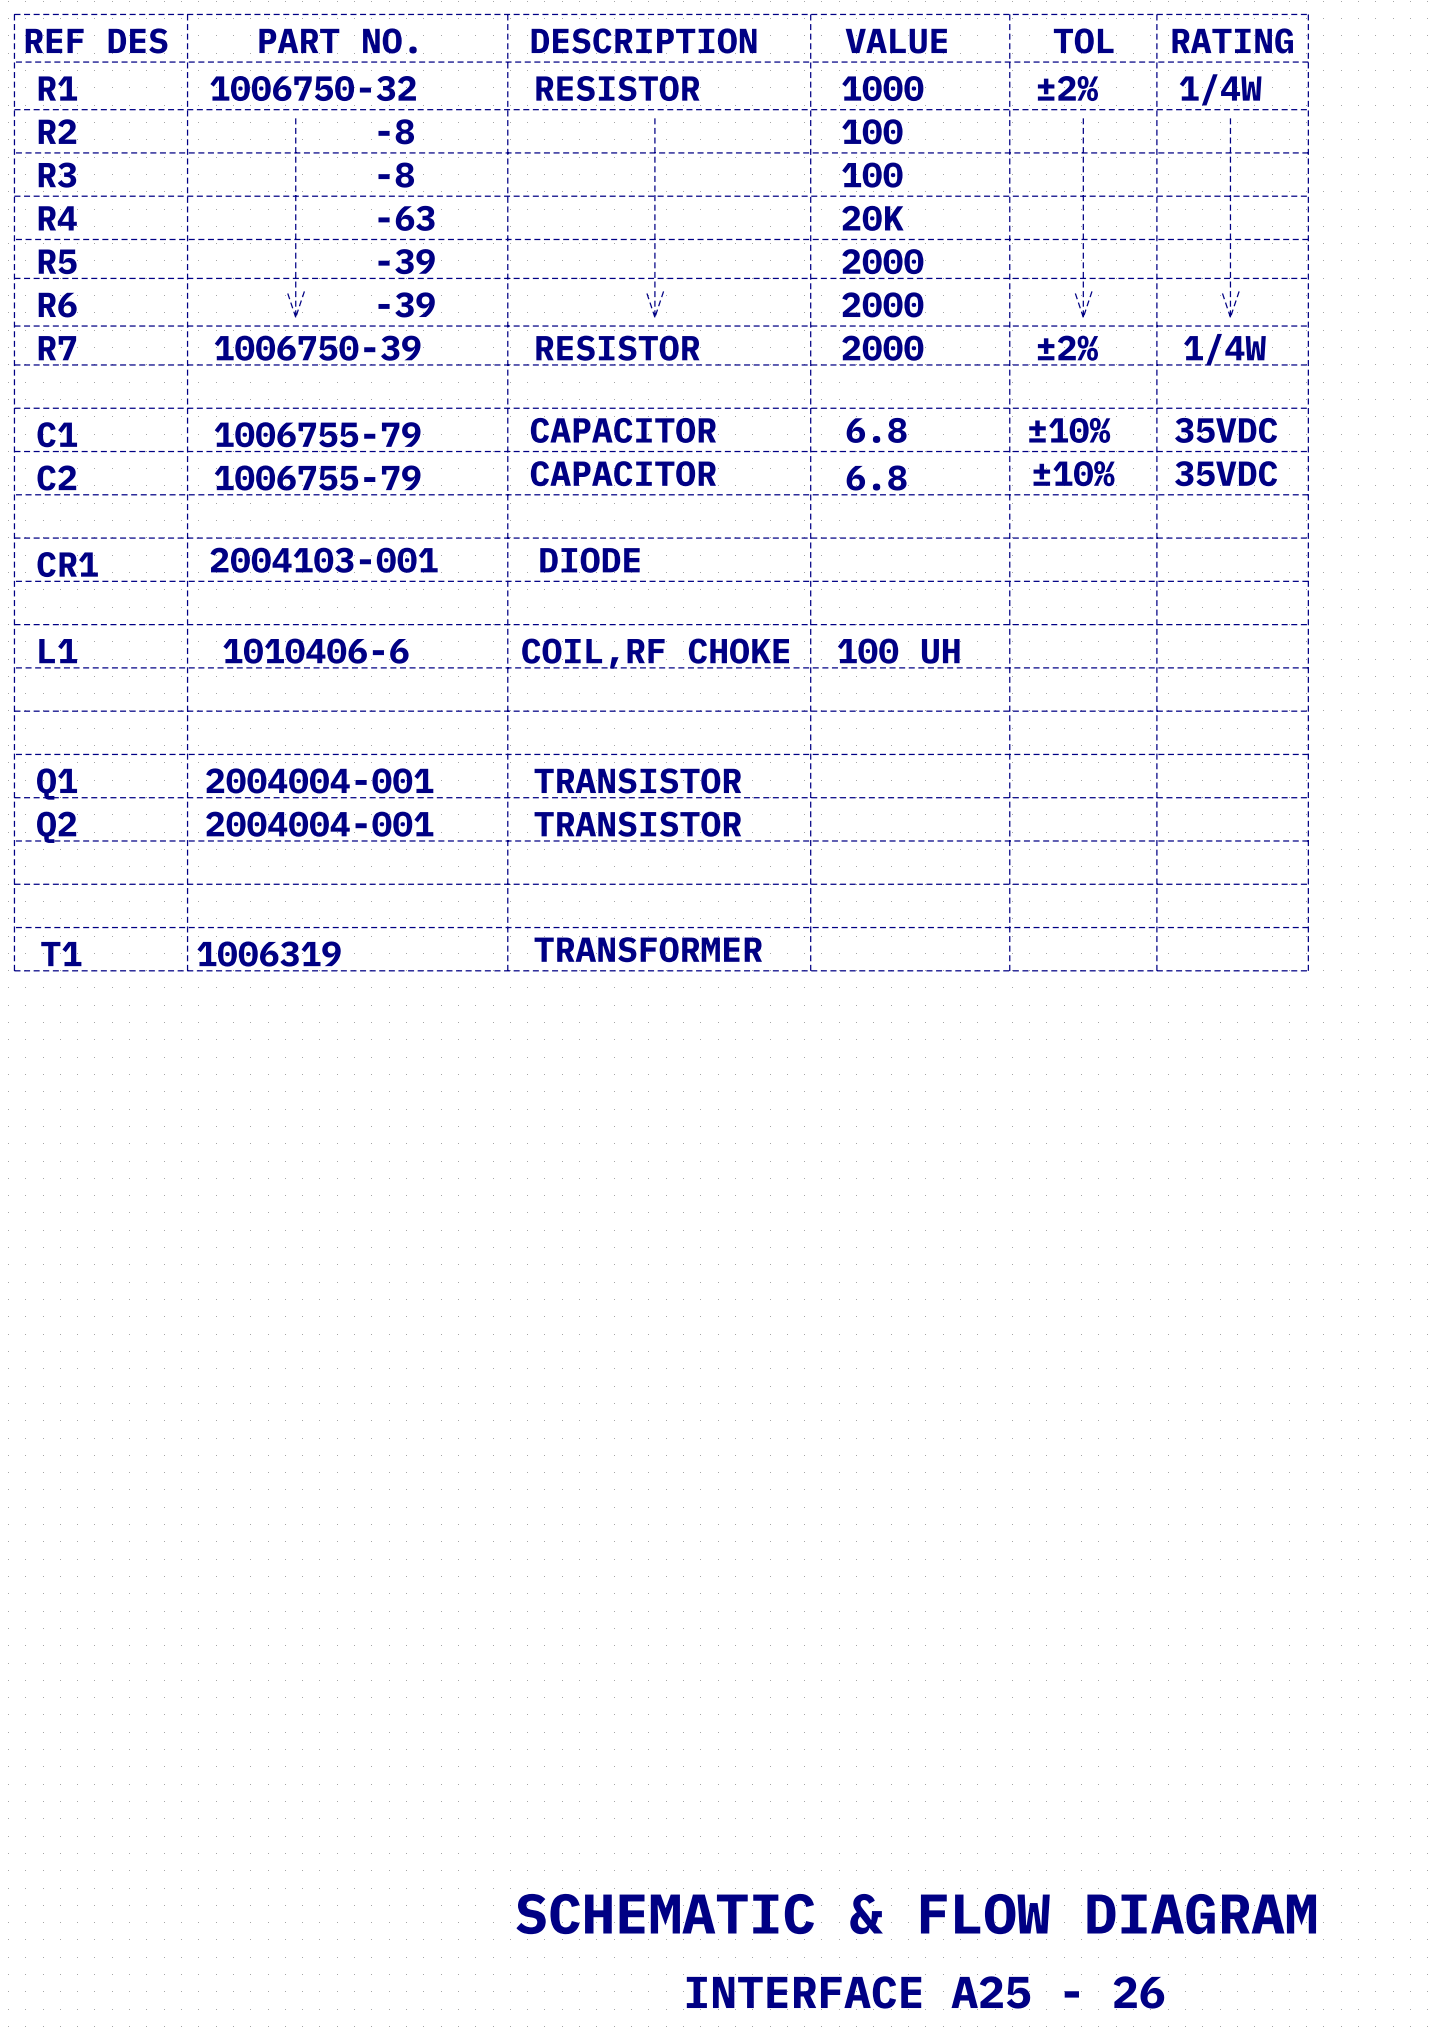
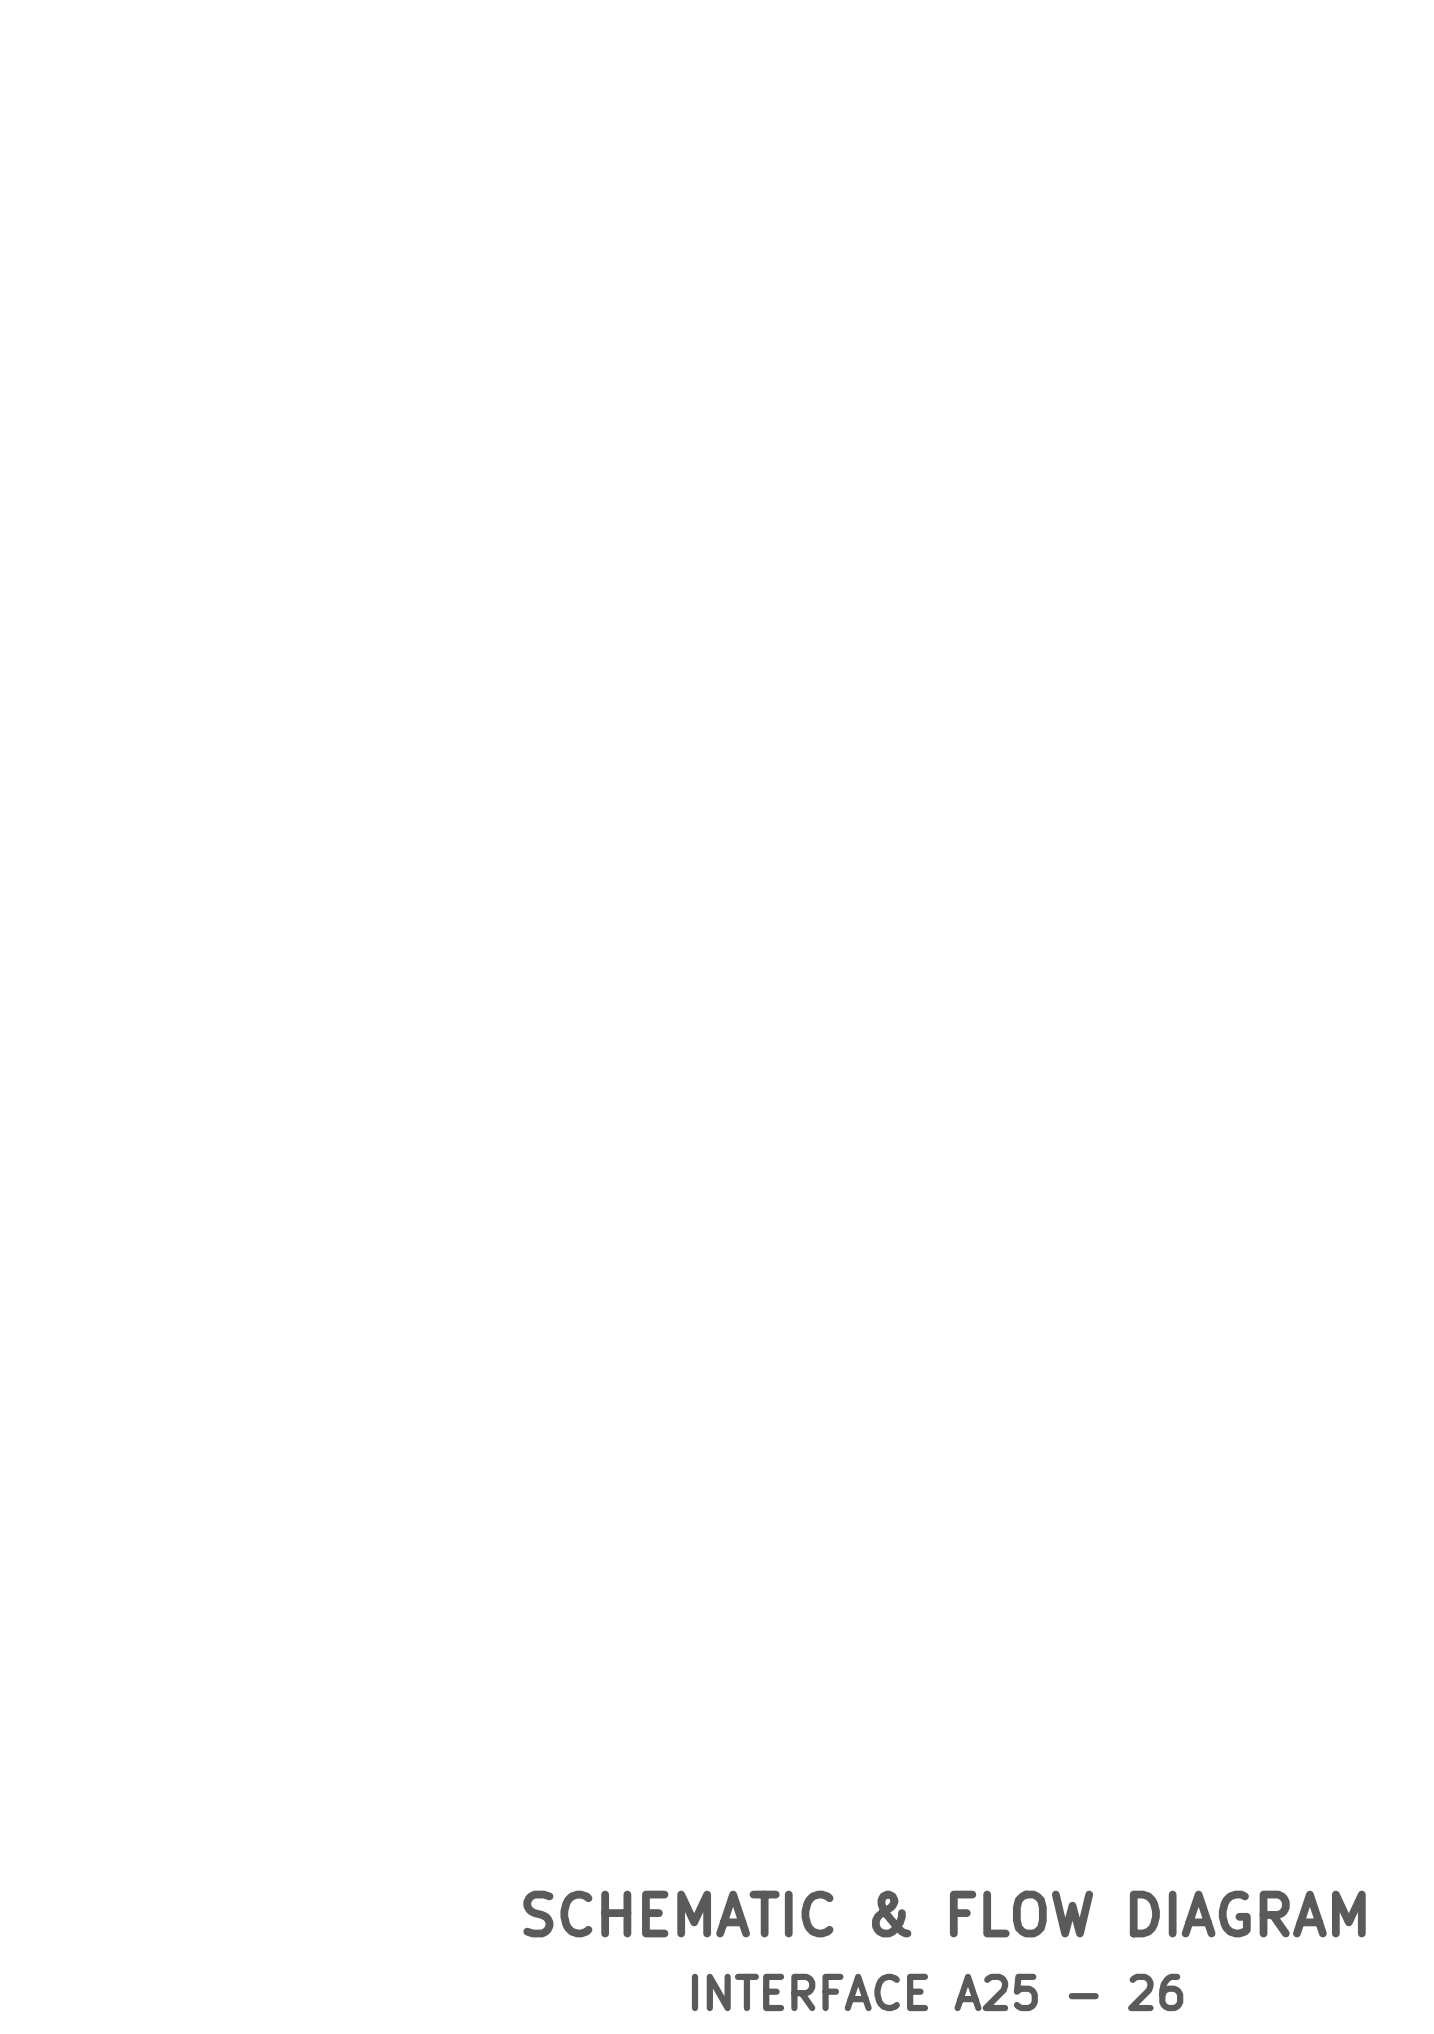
line: (14, 14) (1308, 14) (1308, 970) (14, 970) (14, 14) -> none
line: (187, 14) (187, 970) -> none
line: (507, 14) (507, 970) -> none
line: (810, 14) (810, 970) -> none
line: (1009, 14) (1009, 970) -> none
line: (1156, 14) (1156, 970) -> none
text: REF DES (96, 40) -> none
text: PART NO. (338, 40) -> none
text: DESCRIPTION (644, 40) -> none
text: TOL (1083, 40) -> none
text: RATING (1232, 40) -> none
text: VALUE (896, 41) -> none
line: (14, 62) (1308, 62) -> none
text: R1 (57, 88) -> none
text: 1006750-32 (313, 88) -> none
text: RESISTOR (617, 88) -> none
text: 1000 (882, 88) -> none
text: ±2% (1068, 88) -> none
text: 1/4W (1220, 89) -> none
line: (14, 109) (1308, 109) -> none
line: (295, 118) (295, 317) -> none
line: (654, 118) (654, 317) -> none
line: (1083, 118) (1083, 317) -> none
line: (1230, 118) (1230, 317) -> none
text: R2 (57, 131) -> none
text: -8 (396, 131) -> none
text: 100 (872, 131) -> none
line: (14, 152) (1308, 152) -> none
text: R3 (57, 175) -> none
text: -8 (396, 175) -> none
text: 100 (872, 175) -> none
line: (14, 196) (1308, 196) -> none
text: R4 (57, 218) -> none
text: -63 (406, 218) -> none
text: 20K (872, 218) -> none
line: (14, 239) (1308, 239) -> none
text: R5 (57, 261) -> none
text: -39 (406, 261) -> none
text: 2000 (882, 261) -> none
line: (14, 278) (1308, 278) -> none
line: (287, 291) (295, 317) -> none
line: (304, 291) (295, 317) -> none
line: (646, 291) (654, 317) -> none
line: (663, 291) (654, 317) -> none
line: (1074, 291) (1083, 317) -> none
line: (1091, 291) (1083, 317) -> none
line: (1221, 291) (1230, 317) -> none
line: (1239, 291) (1230, 317) -> none
text: -39 (406, 304) -> none
text: 2000 (882, 304) -> none
text: R6 (57, 305) -> none
line: (14, 326) (1308, 326) -> none
text: R7 (57, 348) -> none
text: 1006750-39 (317, 348) -> none
text: RESISTOR (617, 348) -> none
text: 2000 (882, 348) -> none
text: ±2% (1068, 348) -> none
text: 1/4W (1224, 349) -> none
line: (14, 364) (1308, 364) -> none
line: (14, 408) (1308, 408) -> none
text: CAPACITOR (623, 430) -> none
text: 6.8 (876, 430) -> none
text: ±10% (1069, 430) -> none
text: 35VDC (1226, 430) -> none
text: C1 (57, 434) -> none
text: 1006755-79 (317, 434) -> none
line: (14, 451) (1308, 451) -> none
text: CAPACITOR (623, 473) -> none
text: ±10% (1074, 473) -> none
text: 35VDC (1226, 473) -> none
text: C2 (56, 478) -> none
text: 1006755-79 (317, 478) -> none
text: 6.8 (876, 478) -> none
line: (14, 494) (1308, 494) -> none
line: (14, 538) (1308, 538) -> none
text: 2004103-001 (324, 560) -> none
text: DIODE (589, 560) -> none
text: CR1 (67, 564) -> none
line: (14, 581) (1308, 581) -> none
line: (14, 624) (1308, 624) -> none
text: L1 (58, 651) -> none
text: 1010406-6 (315, 651) -> none
text: 100 UH (898, 651) -> none
text: COIL,RF CHOKE (655, 653) -> none
line: (14, 667) (1308, 667) -> none
line: (14, 711) (1308, 711) -> none
line: (14, 754) (1308, 754) -> none
text: 2004004-001 (319, 780) -> none
text: TRANSISTOR (637, 780) -> none
text: Q1 (57, 784) -> none
line: (14, 797) (1308, 797) -> none
text: 2004004-001 (319, 824) -> none
text: TRANSISTOR (637, 824) -> none
text: Q2 (56, 827) -> none
line: (14, 840) (1308, 840) -> none
line: (14, 884) (1308, 884) -> none
line: (14, 927) (1308, 927) -> none
text: TRANSFORMER (648, 949) -> none
text: T1 (61, 954) -> none
text: 1006319 (269, 954) -> none

